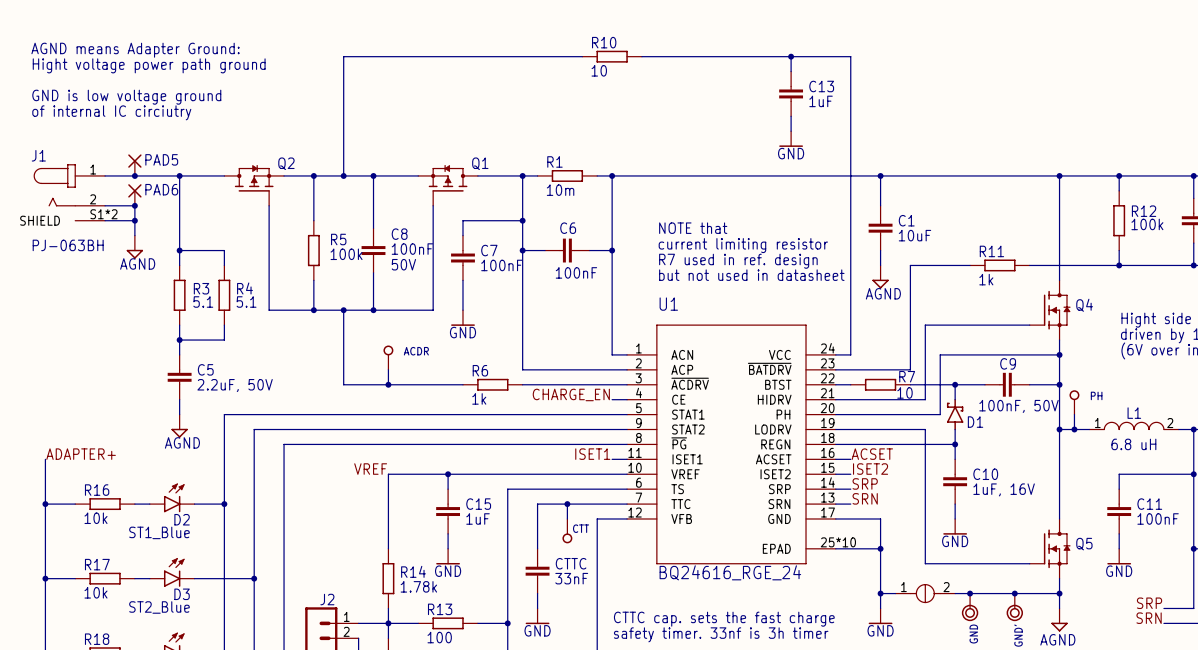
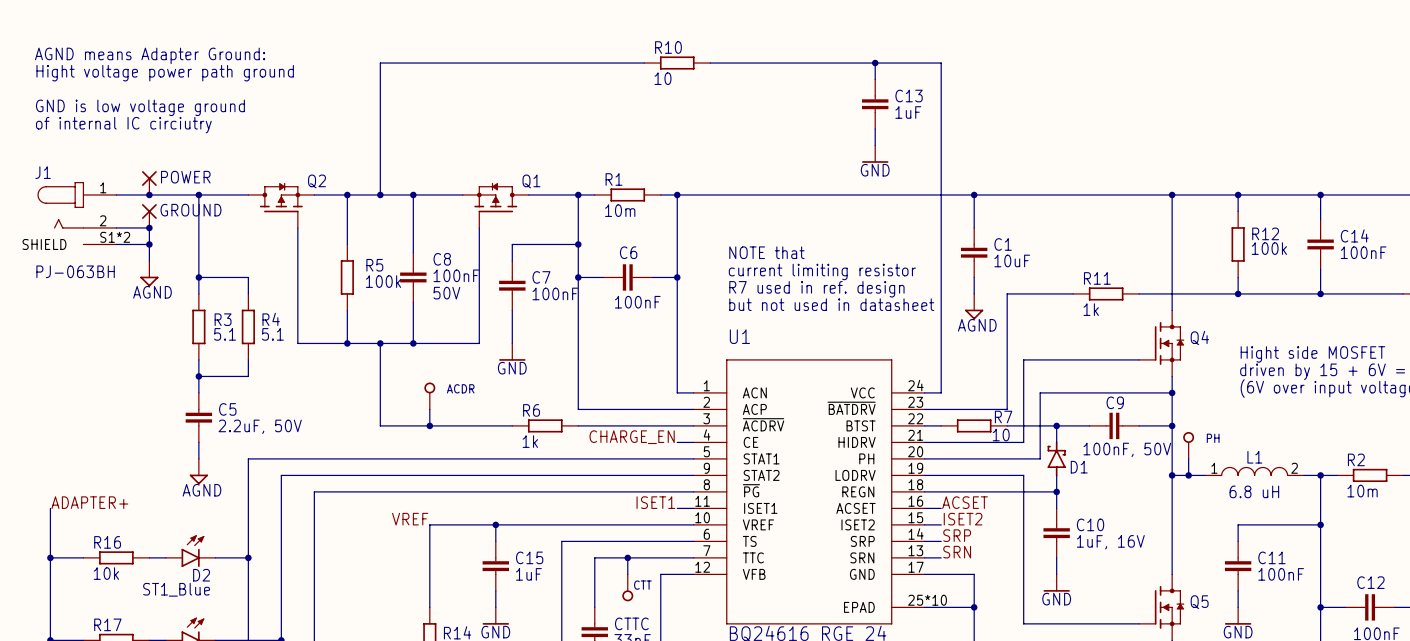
PAD5 name: PAD5 (161, 159) -> POWER (185, 177)
PAD6 name: PAD6 (161, 189) -> GROUND (190, 210)

